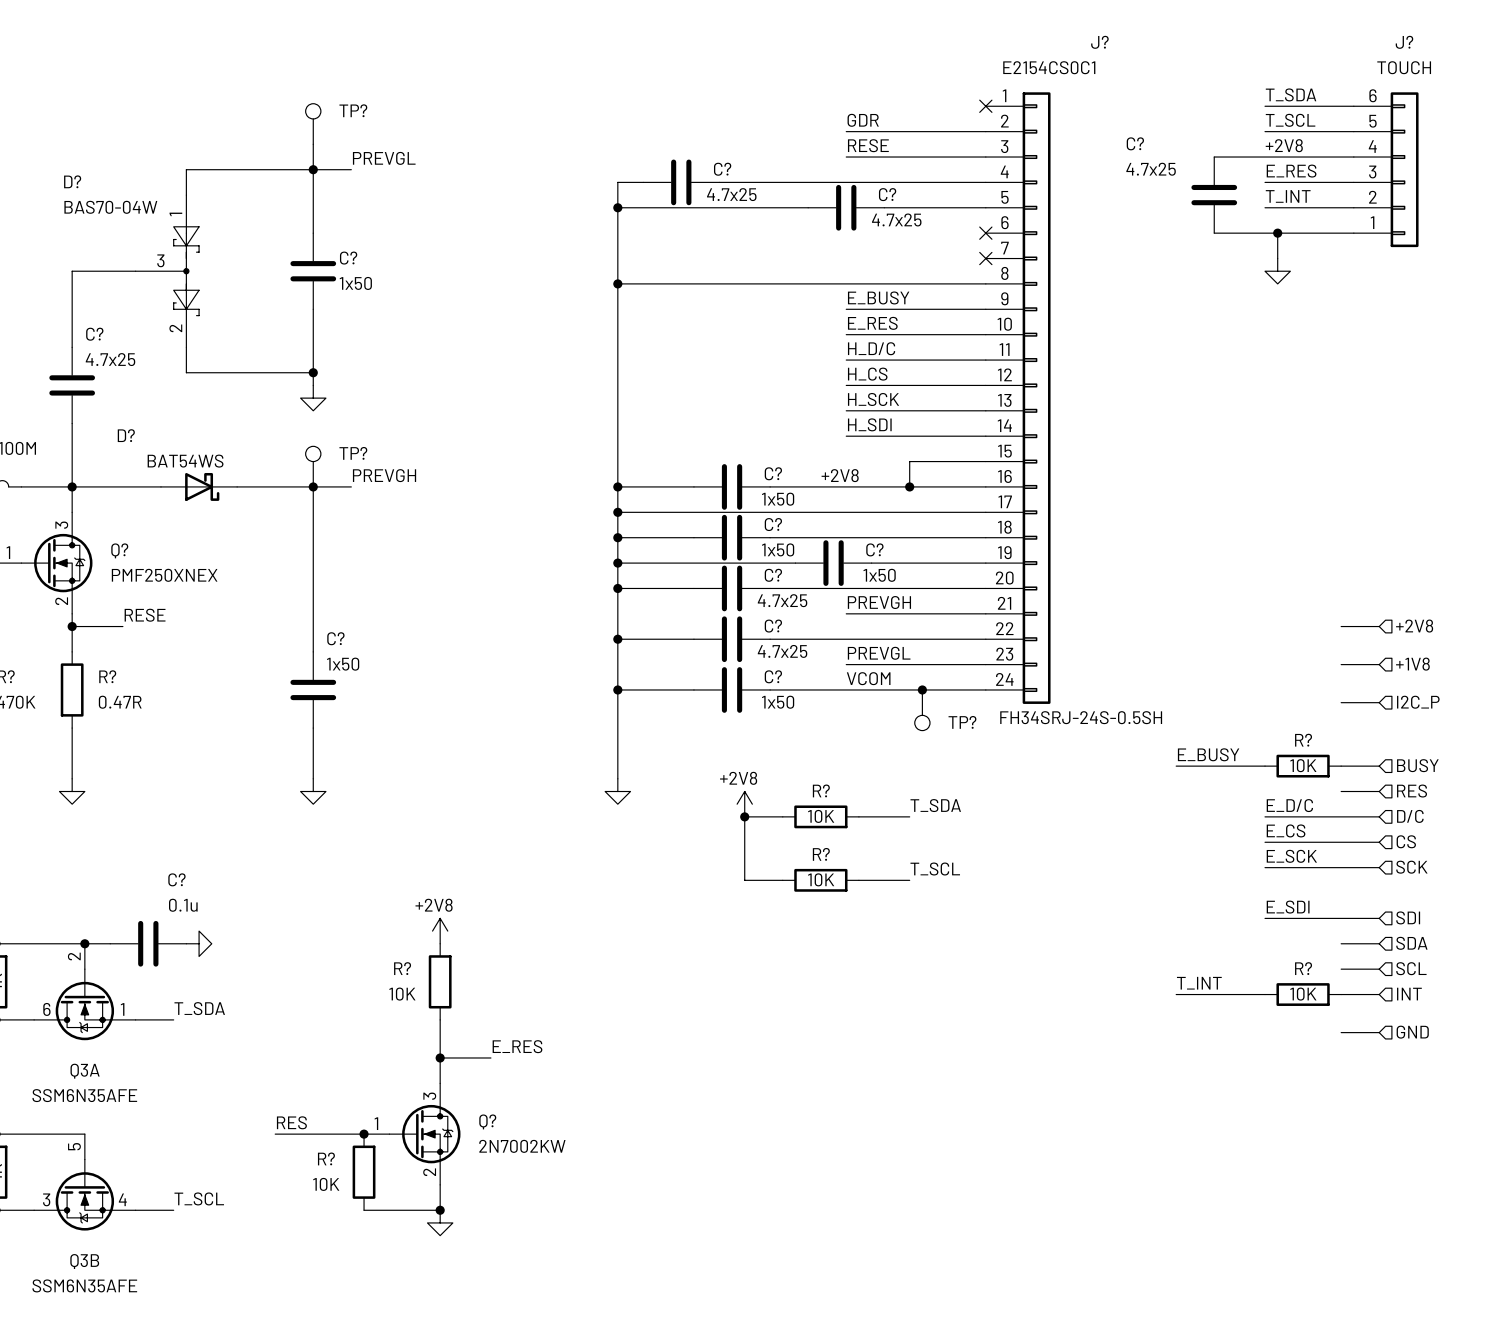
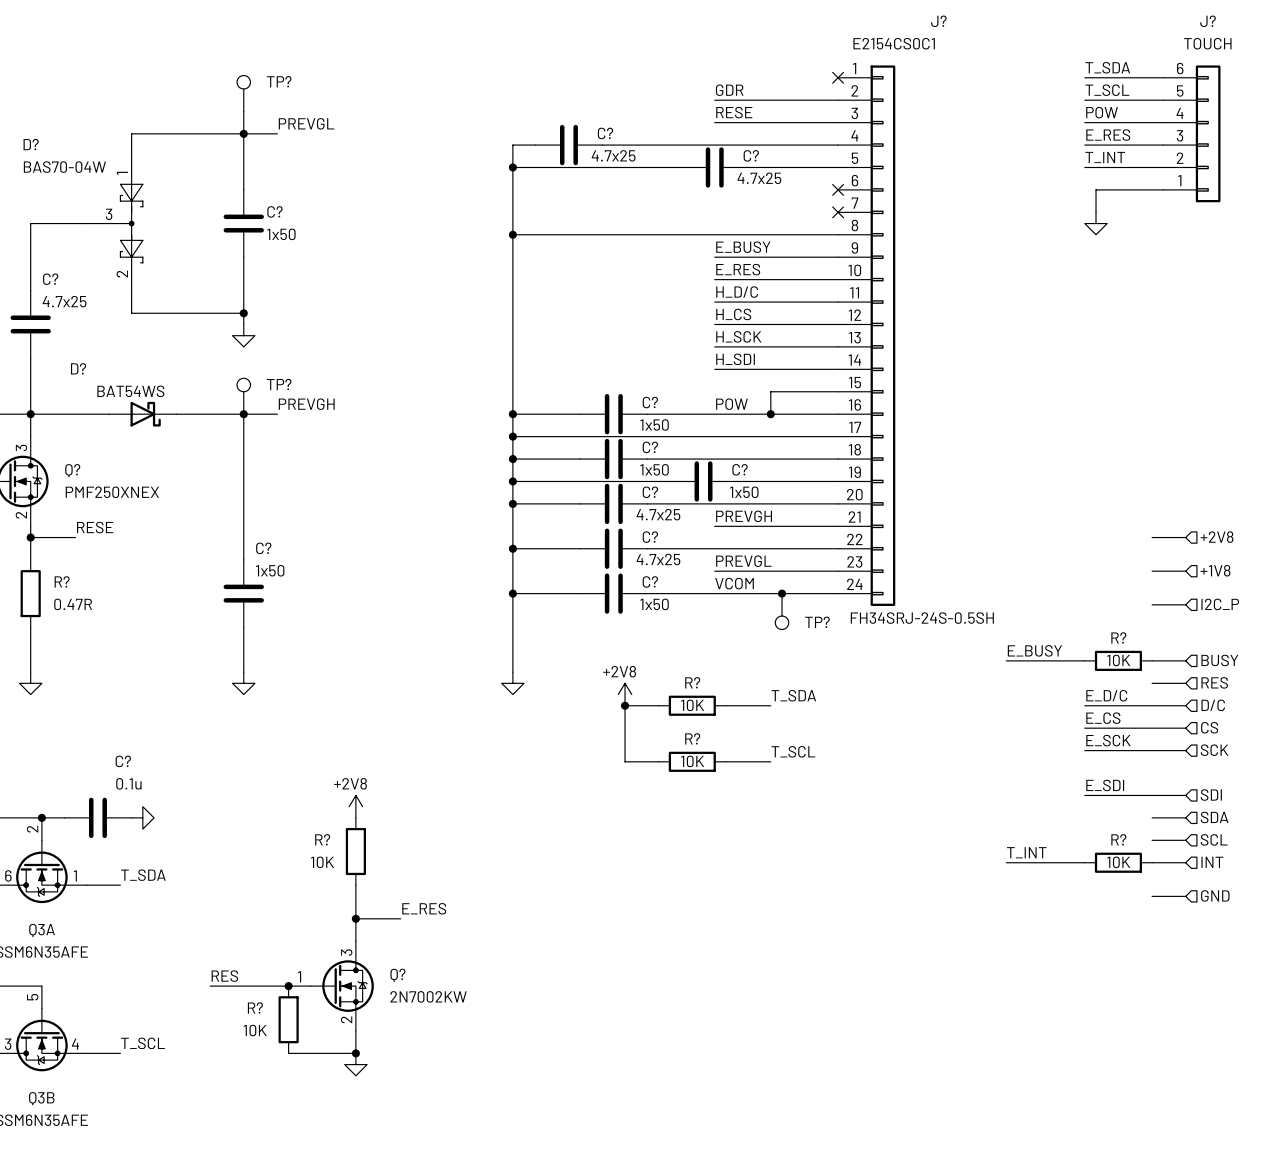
label: +2V8 (1284, 145) -> POW (1102, 112)
wire: (1214, 157) (1265, 157) -> none
C?: 4.7x25 (1214, 195) -> none
wire: (1214, 233) (1277, 233) -> none
junction: (1277, 233) -> none
label: +2V8 (840, 475) -> none
label: none -> POW (731, 404)

